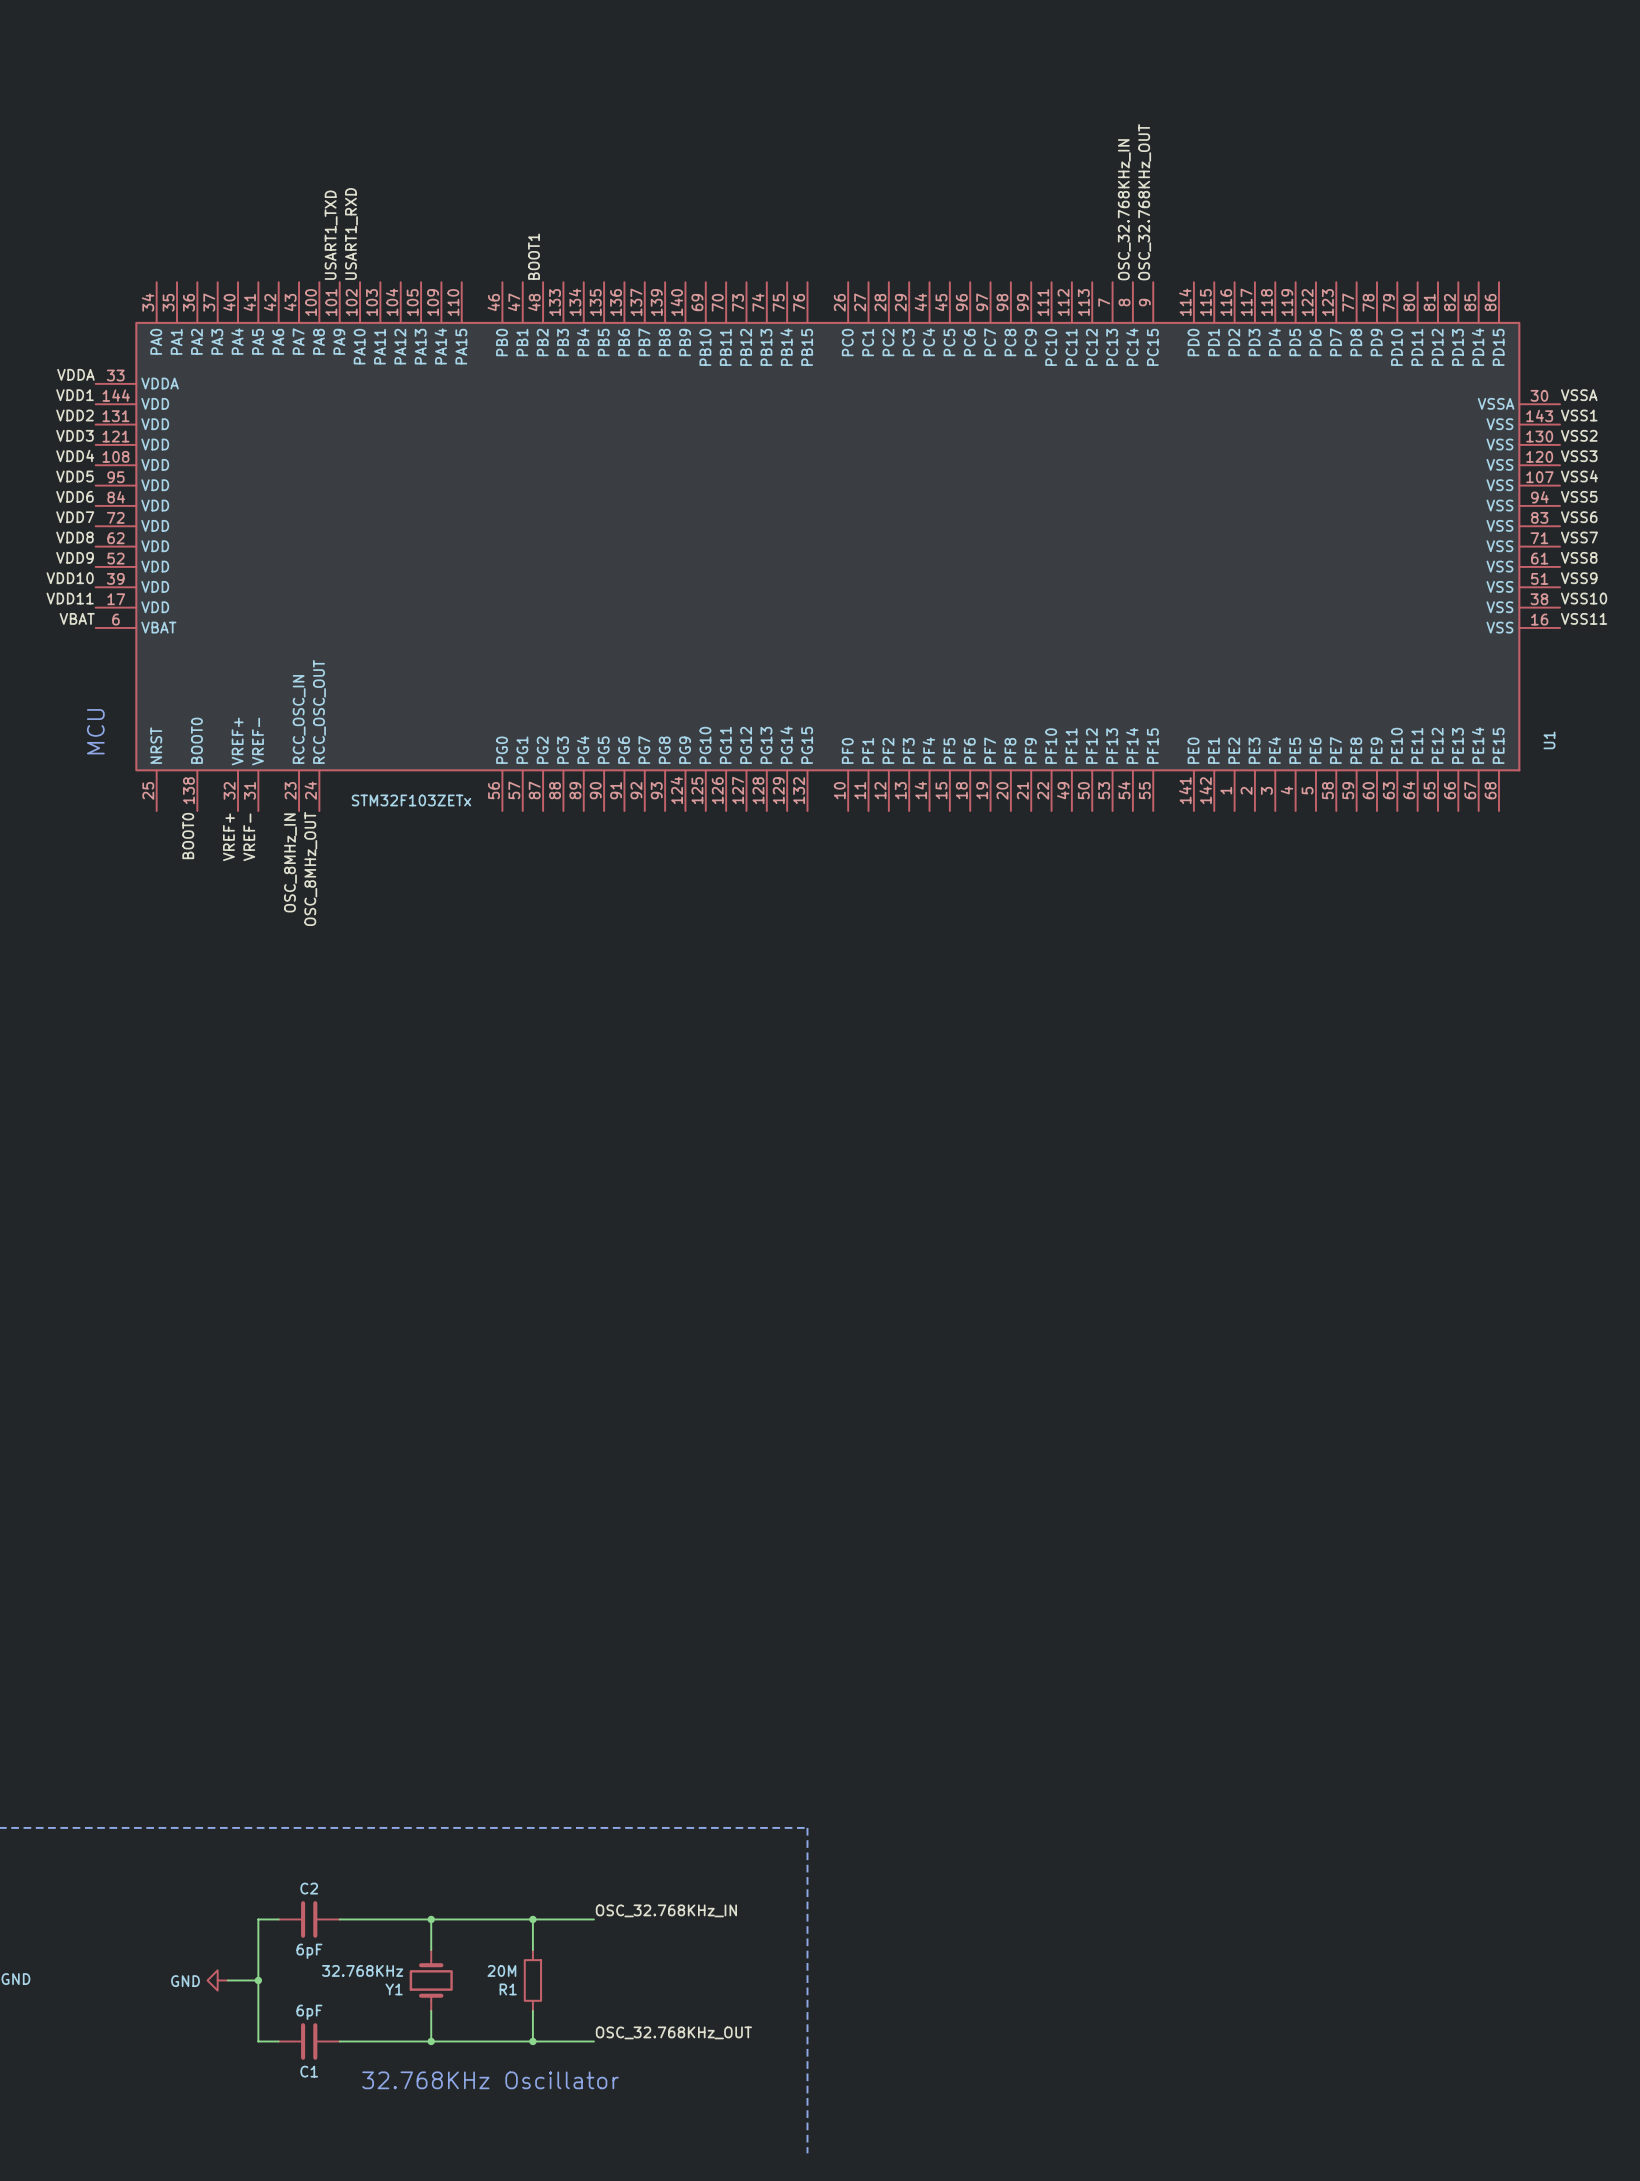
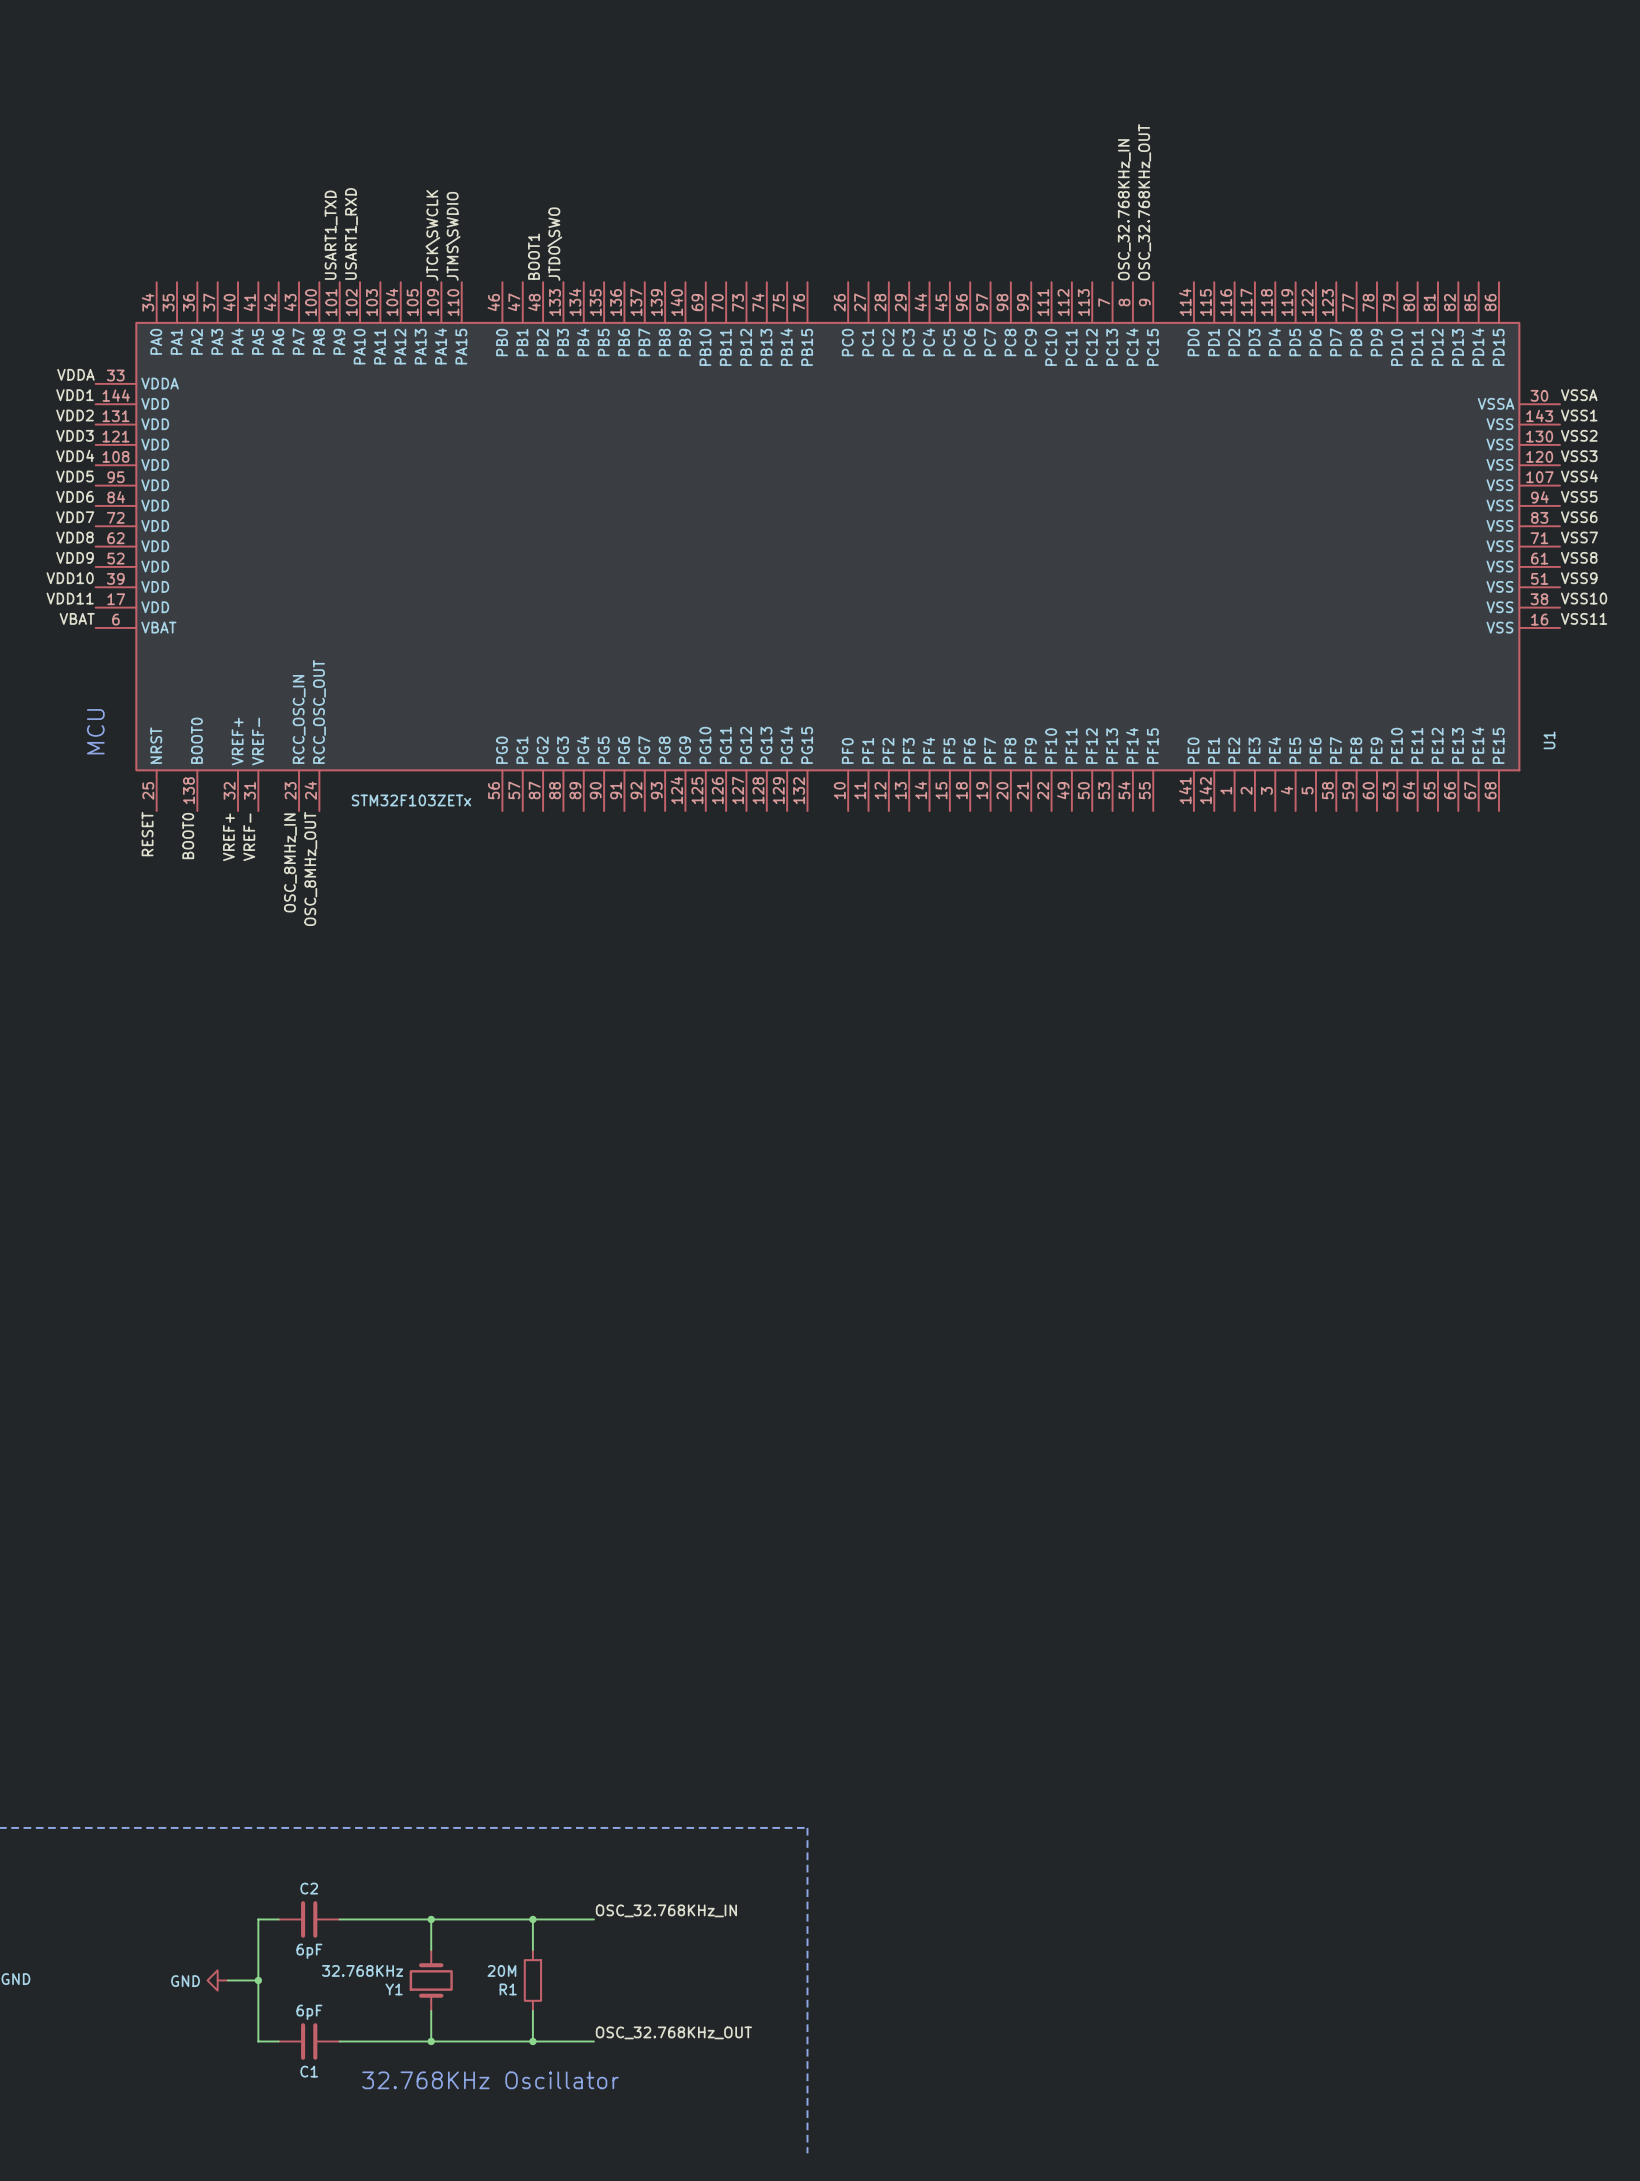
label: none -> JTCK\SWCLK (432, 235)
label: none -> JTMS\SWDIO (453, 236)
label: none -> JTDO\SWO (554, 244)
label: none -> RESET (147, 834)

